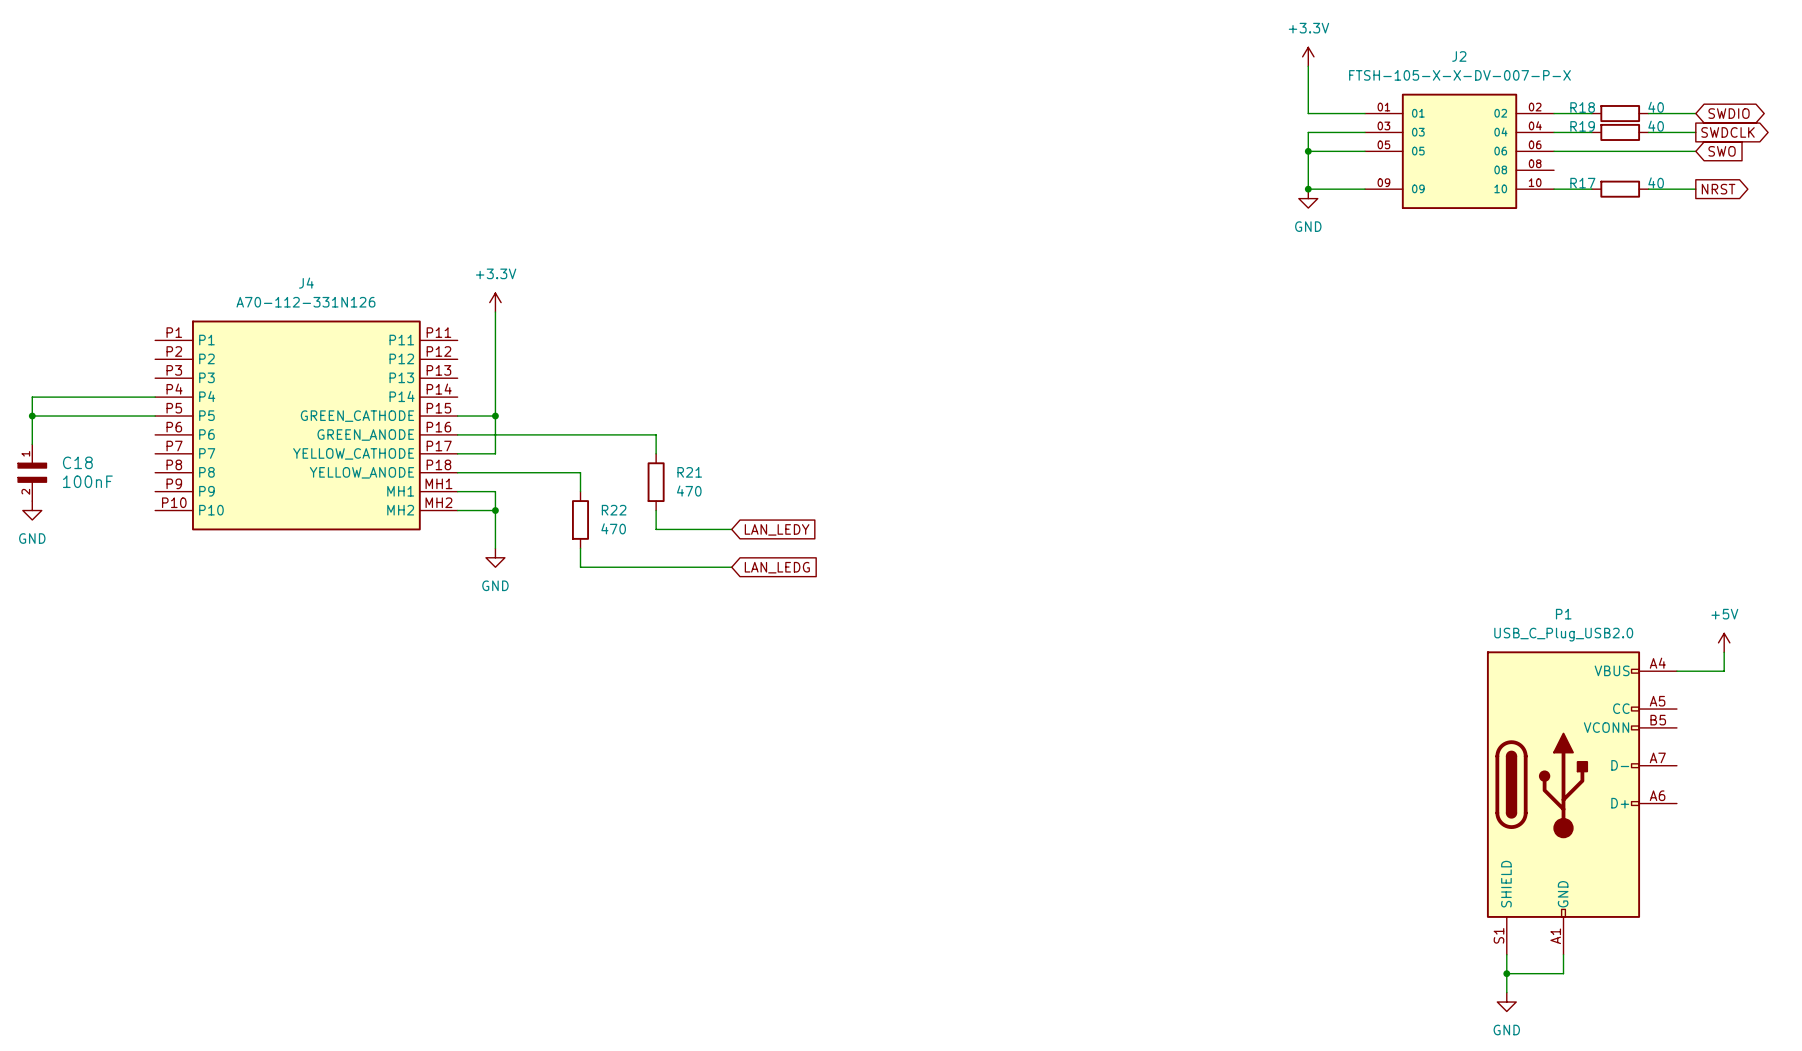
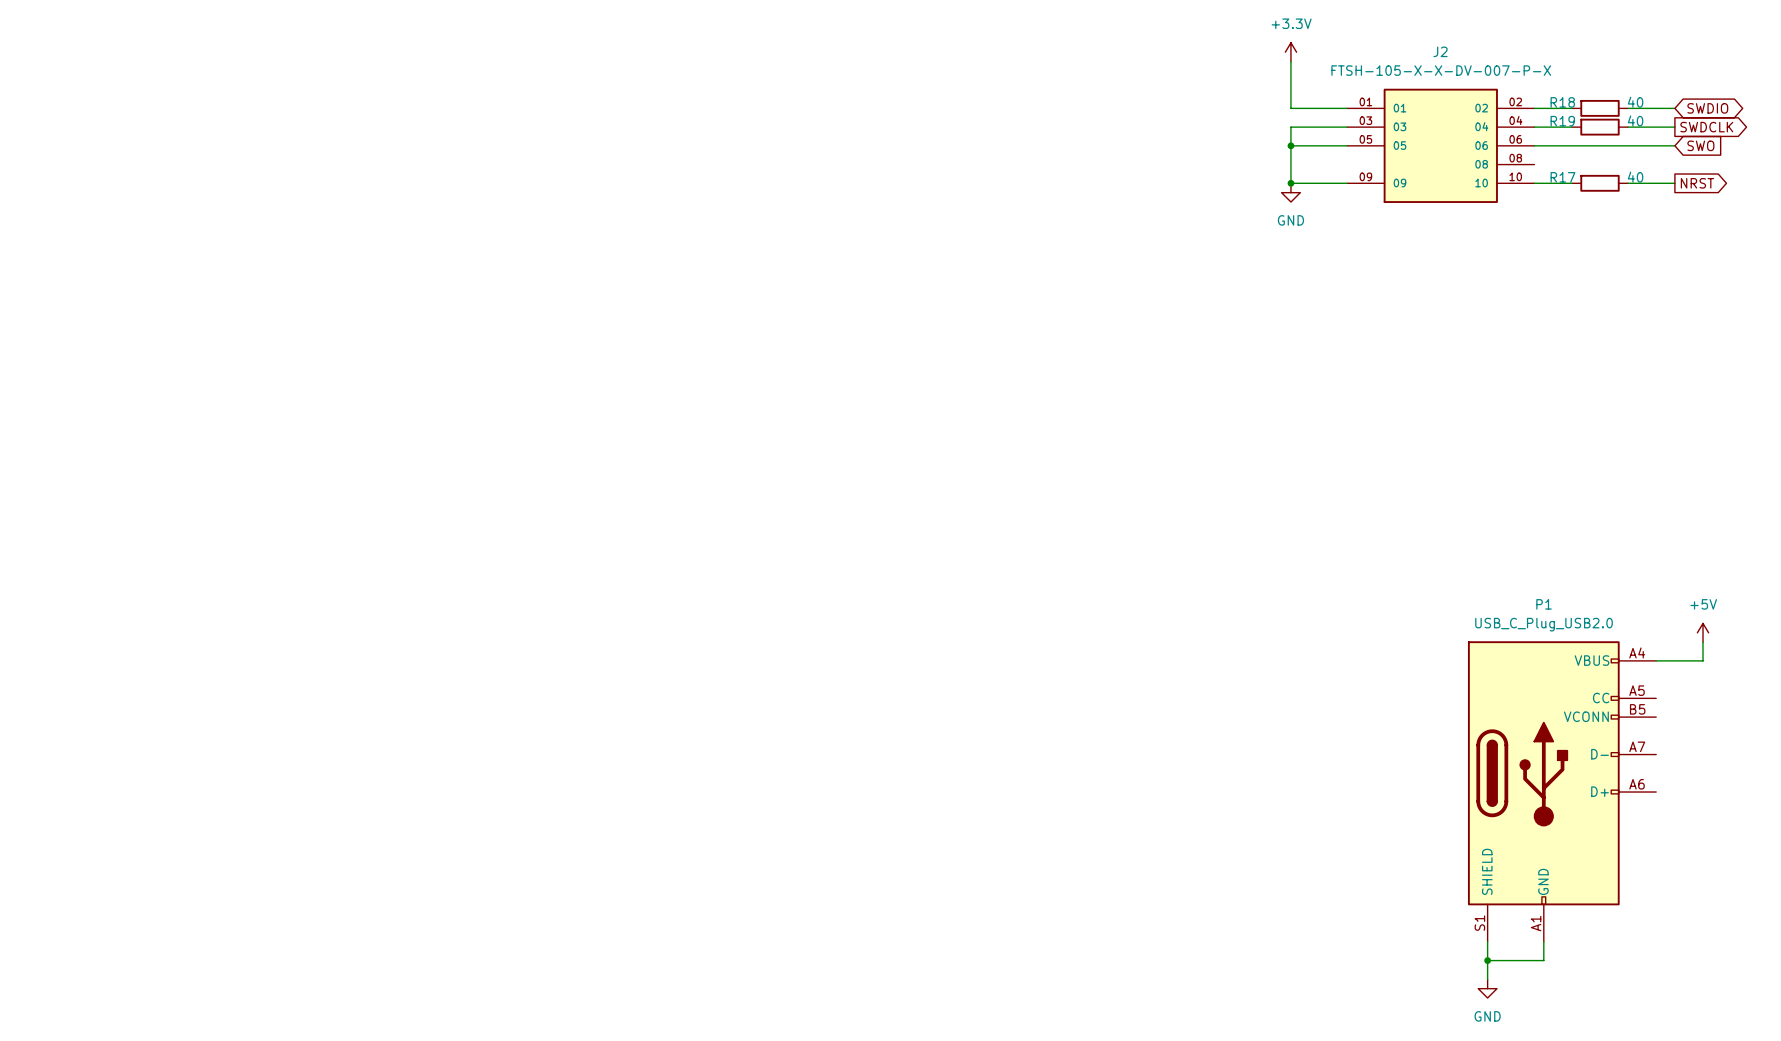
power symbol: +3.3V (495, 302) -> none
wire: (495, 312) (495, 453) (457, 453) -> none
wire: (155, 397) (32, 397) (32, 444) -> none
wire: (32, 416) (155, 416) -> none
junction: (32, 416) -> none
wire: (457, 416) (495, 416) -> none
junction: (495, 416) -> none
J4: A70-112-331N126 (306, 425) -> none
wire: (457, 434) (656, 434) (656, 453) -> none
C18: 100nF (32, 472) -> none
wire: (457, 472) (580, 472) (580, 491) -> none
R21: 470 (656, 482) -> none
wire: (457, 491) (495, 491) (495, 548) -> none
power symbol: GND (32, 510) -> none
wire: (457, 510) (495, 510) -> none
junction: (495, 510) -> none
wire: (656, 510) (656, 529) (731, 529) -> none
R22: 470 (580, 519) -> none
global label: LAN_LEDY (777, 529) -> none
wire: (580, 548) (580, 567) (731, 567) -> none
power symbol: GND (495, 557) -> none
global label: LAN_LEDG (777, 567) -> none

